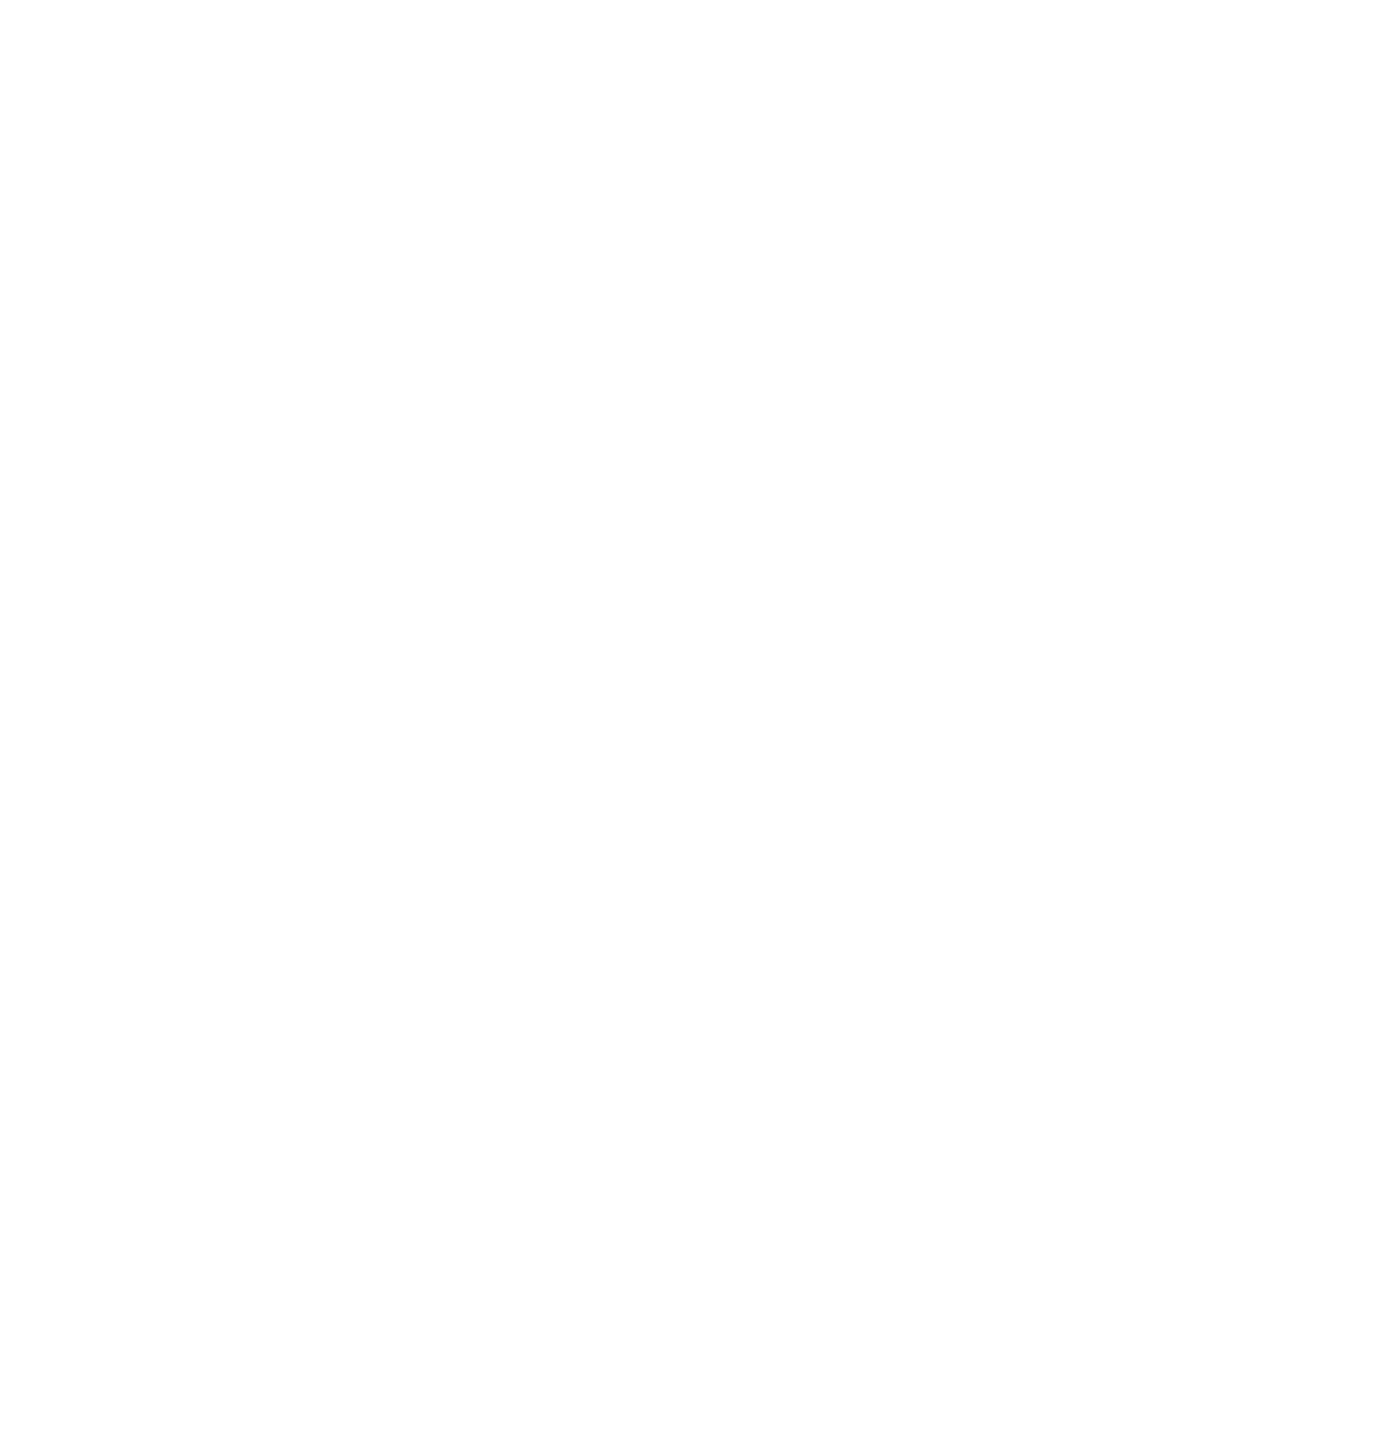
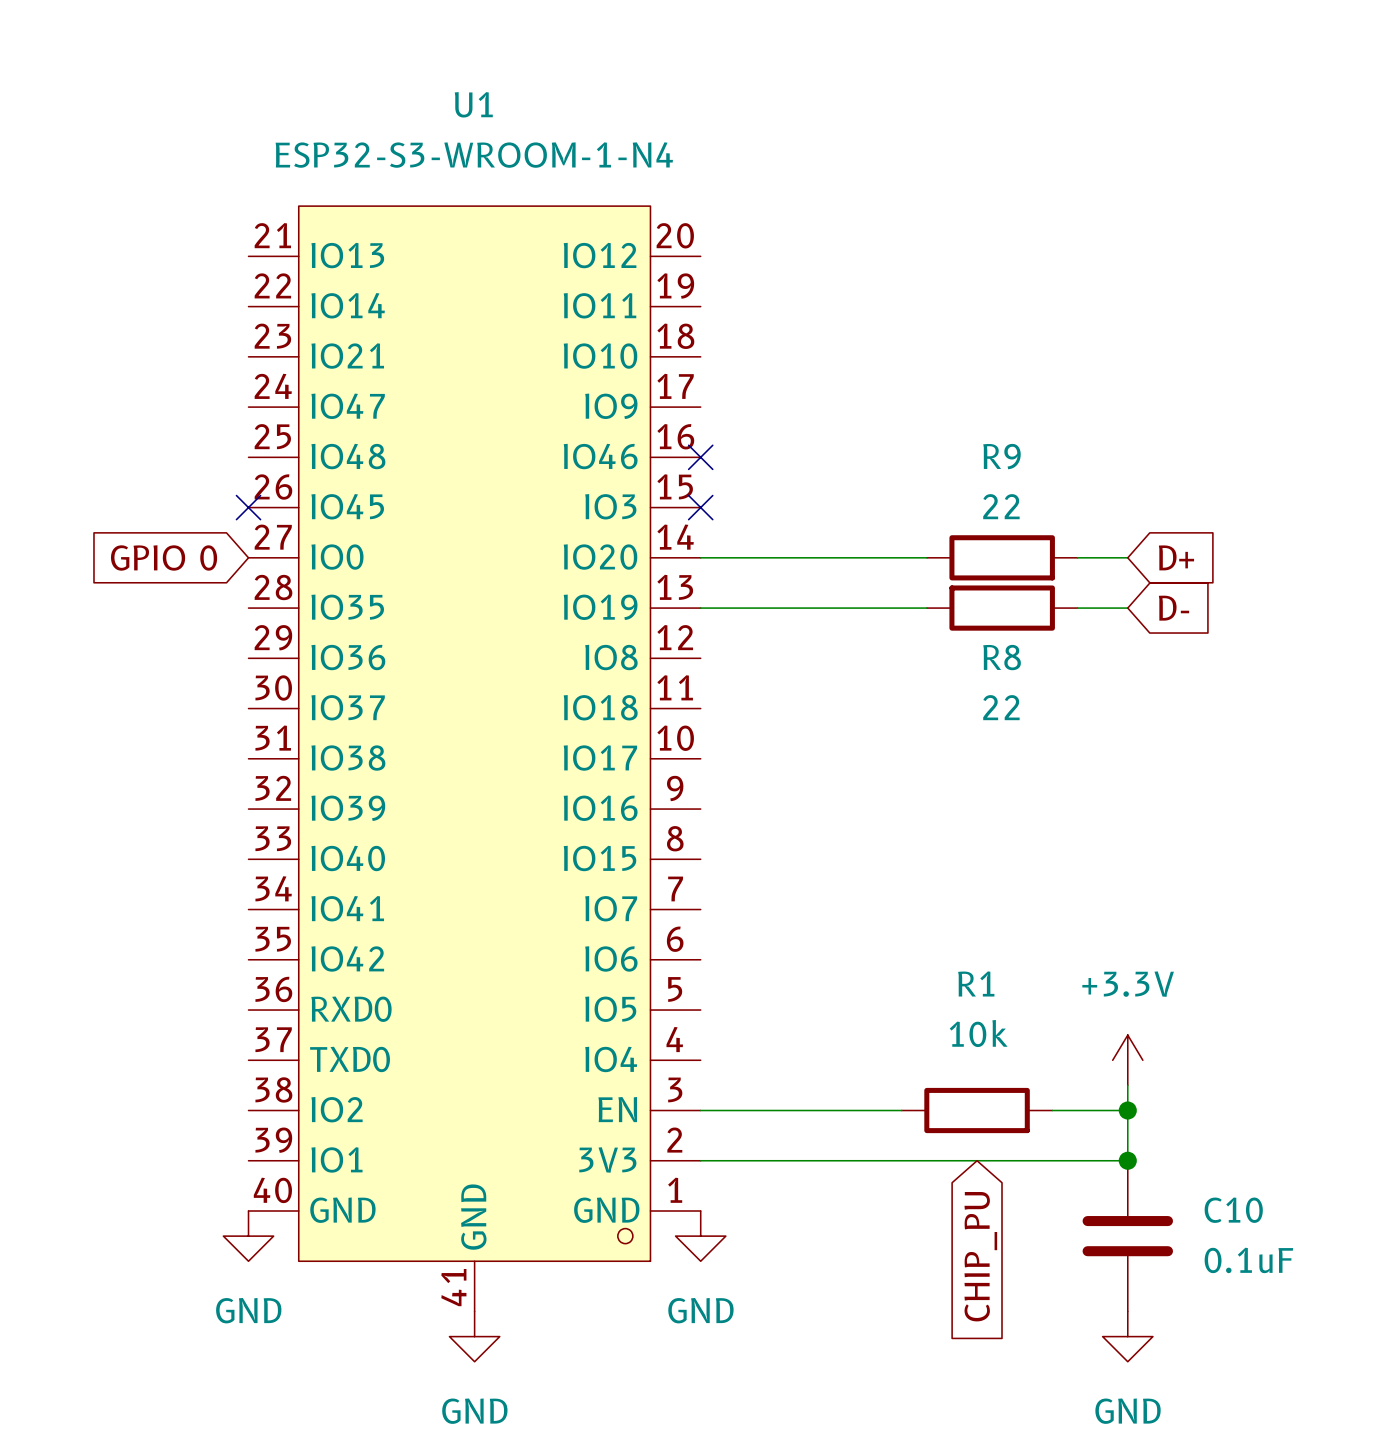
no-connect mark: none -> (700, 457)
no-connect mark: none -> (248, 507)
no-connect mark: none -> (700, 507)
global label: none -> GPIO 0 (164, 557)
wire: none -> (700, 557) (926, 557)
R9: none -> 22 (1002, 557)
wire: none -> (1077, 557) (1127, 557)
global label: none -> D+ (1176, 557)
wire: none -> (700, 608) (926, 608)
R8: none -> 22 (1002, 608)
wire: none -> (1077, 608) (1127, 608)
global label: none -> D- (1173, 608)
U1: none -> ESP32-S3-WROOM-1-N4 (474, 758)
power symbol: none -> +3.3V (1127, 1060)
wire: none -> (1127, 1085) (1127, 1160) (700, 1160)
wire: none -> (700, 1110) (901, 1110)
R1: none -> 10k (977, 1110)
wire: none -> (1052, 1110) (1127, 1110)
junction: none -> (1127, 1110)
junction: none -> (1127, 1160)
power symbol: none -> GND (248, 1236)
power symbol: none -> GND (700, 1236)
C10: none -> 0.1uF (1127, 1236)
global label: none -> CHIP_PU (980, 1256)
power symbol: none -> GND (474, 1336)
power symbol: none -> GND (1127, 1336)

